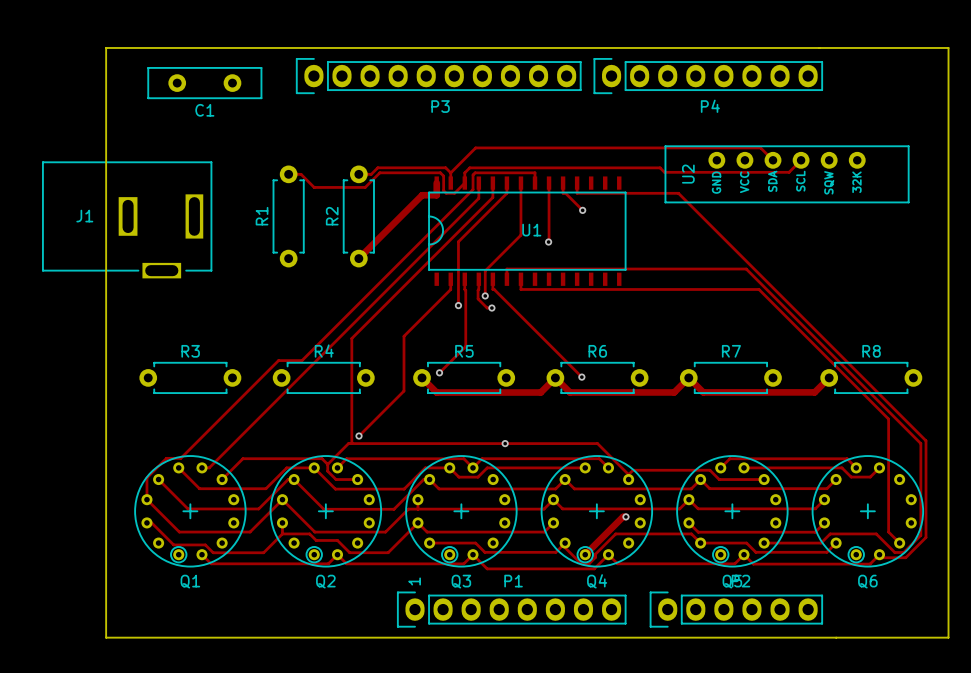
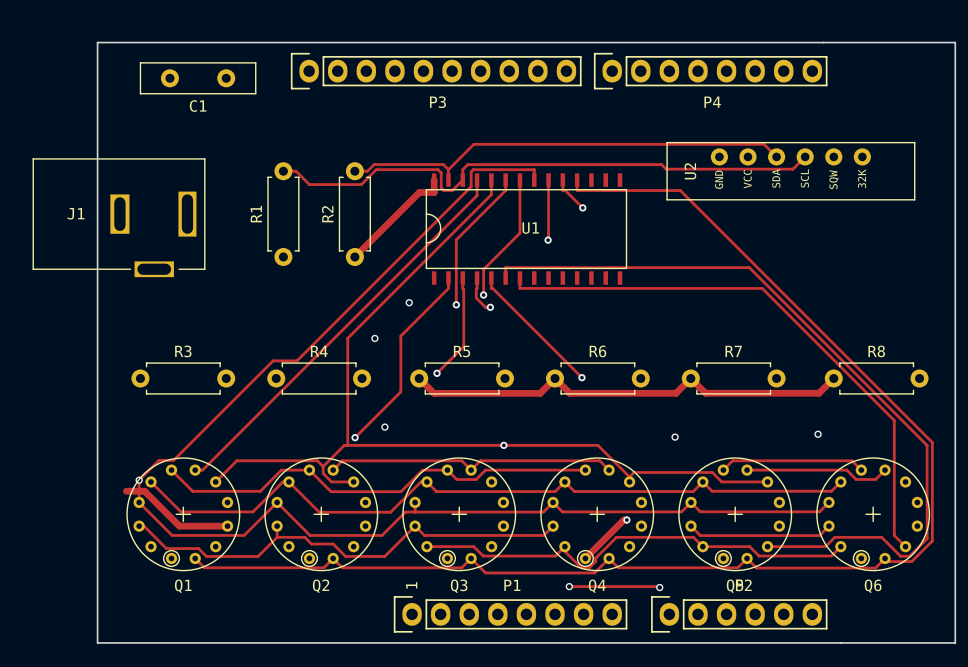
via: none -> (409, 302)
via: none -> (374, 338)
via: none -> (384, 427)
via: none -> (818, 434)
via: none -> (675, 437)
via: none -> (139, 480)
track: none -> (126, 491) (144, 491) (179, 526) (227, 526)
track: none -> (569, 586) (659, 587)
via: none -> (569, 586)
via: none -> (659, 587)

